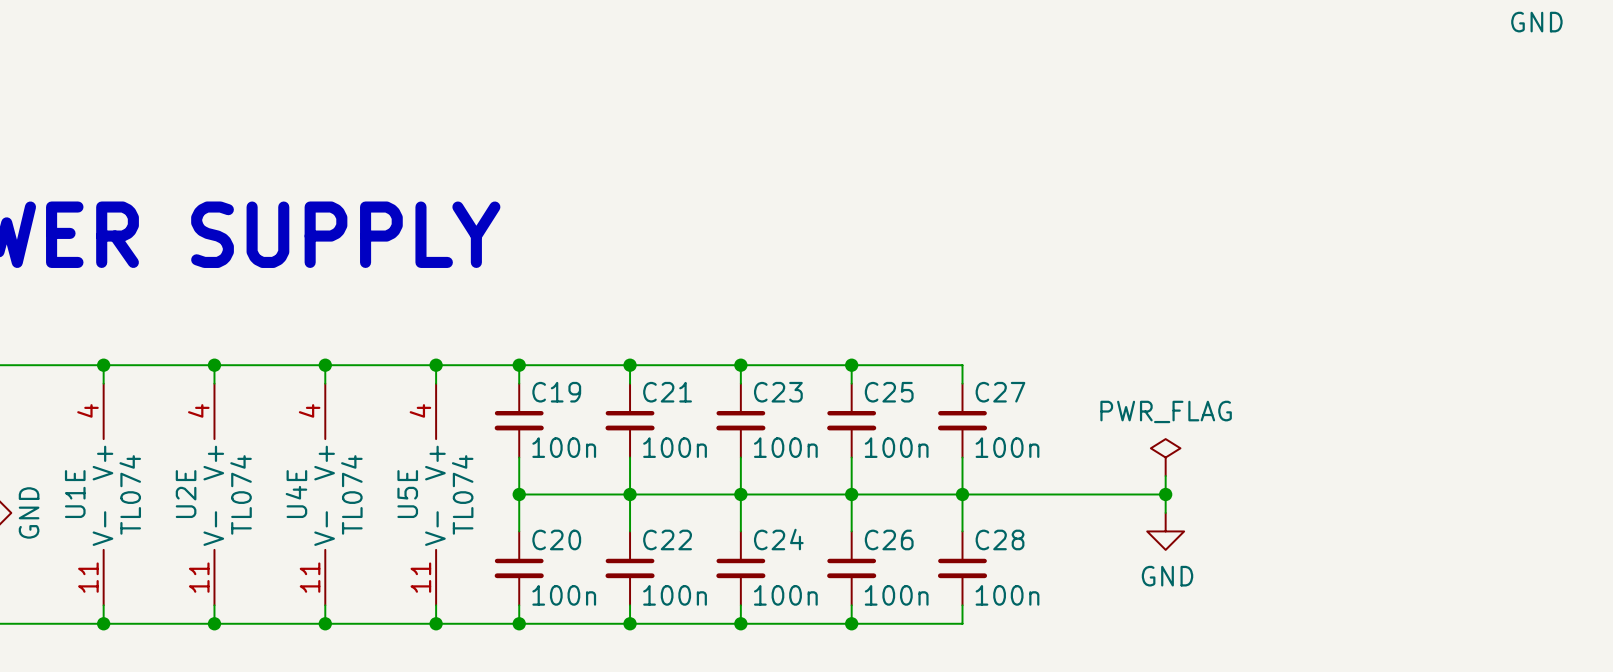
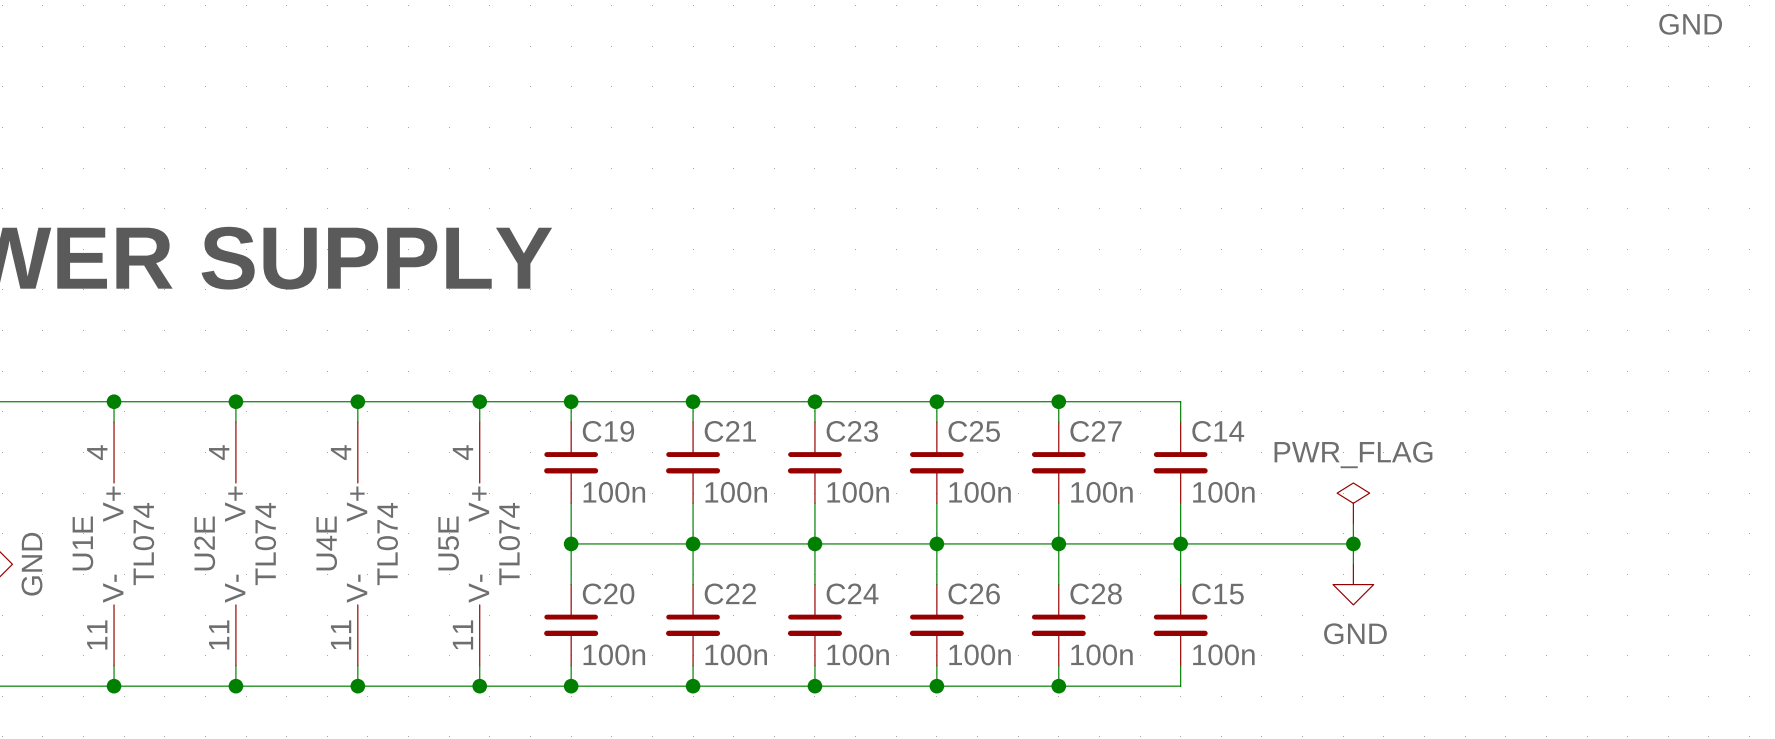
wire: none -> (1058, 401) (1180, 401) (1180, 422)
junction: none -> (1058, 401)
C14: none -> 100n (1180, 462)
wire: none -> (1180, 503) (1180, 584)
power symbol position: PWR_FLAG (1165, 457) -> PWR_FLAG (1353, 503)
wire: (1165, 476) (1165, 512) -> (1353, 523) (1353, 564)
junction: none -> (1180, 543)
wire: none -> (1282, 543) (1353, 543)
junction: (1165, 494) -> none
junction: none -> (1353, 543)
power symbol position: GND (1165, 531) -> GND (1353, 584)
C15: none -> 100n (1180, 625)
wire: none -> (1180, 665) (1180, 686) (1058, 686)
junction: none -> (1058, 686)

